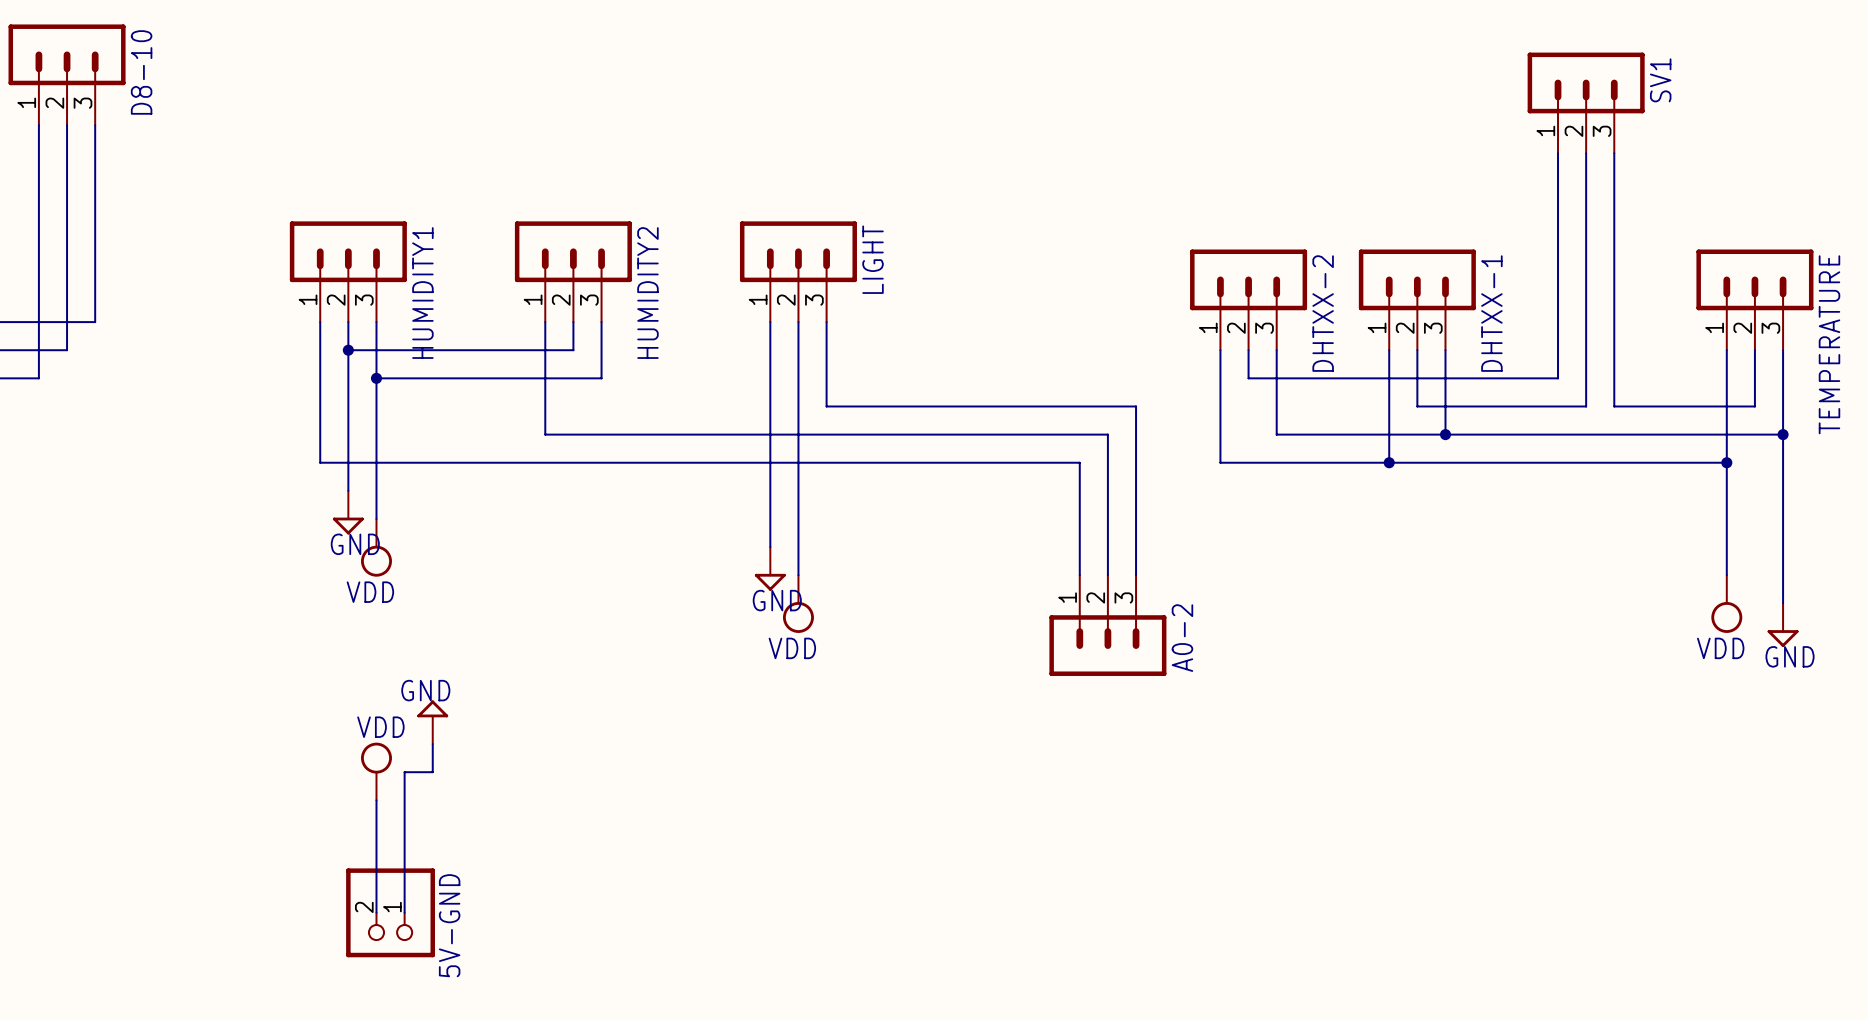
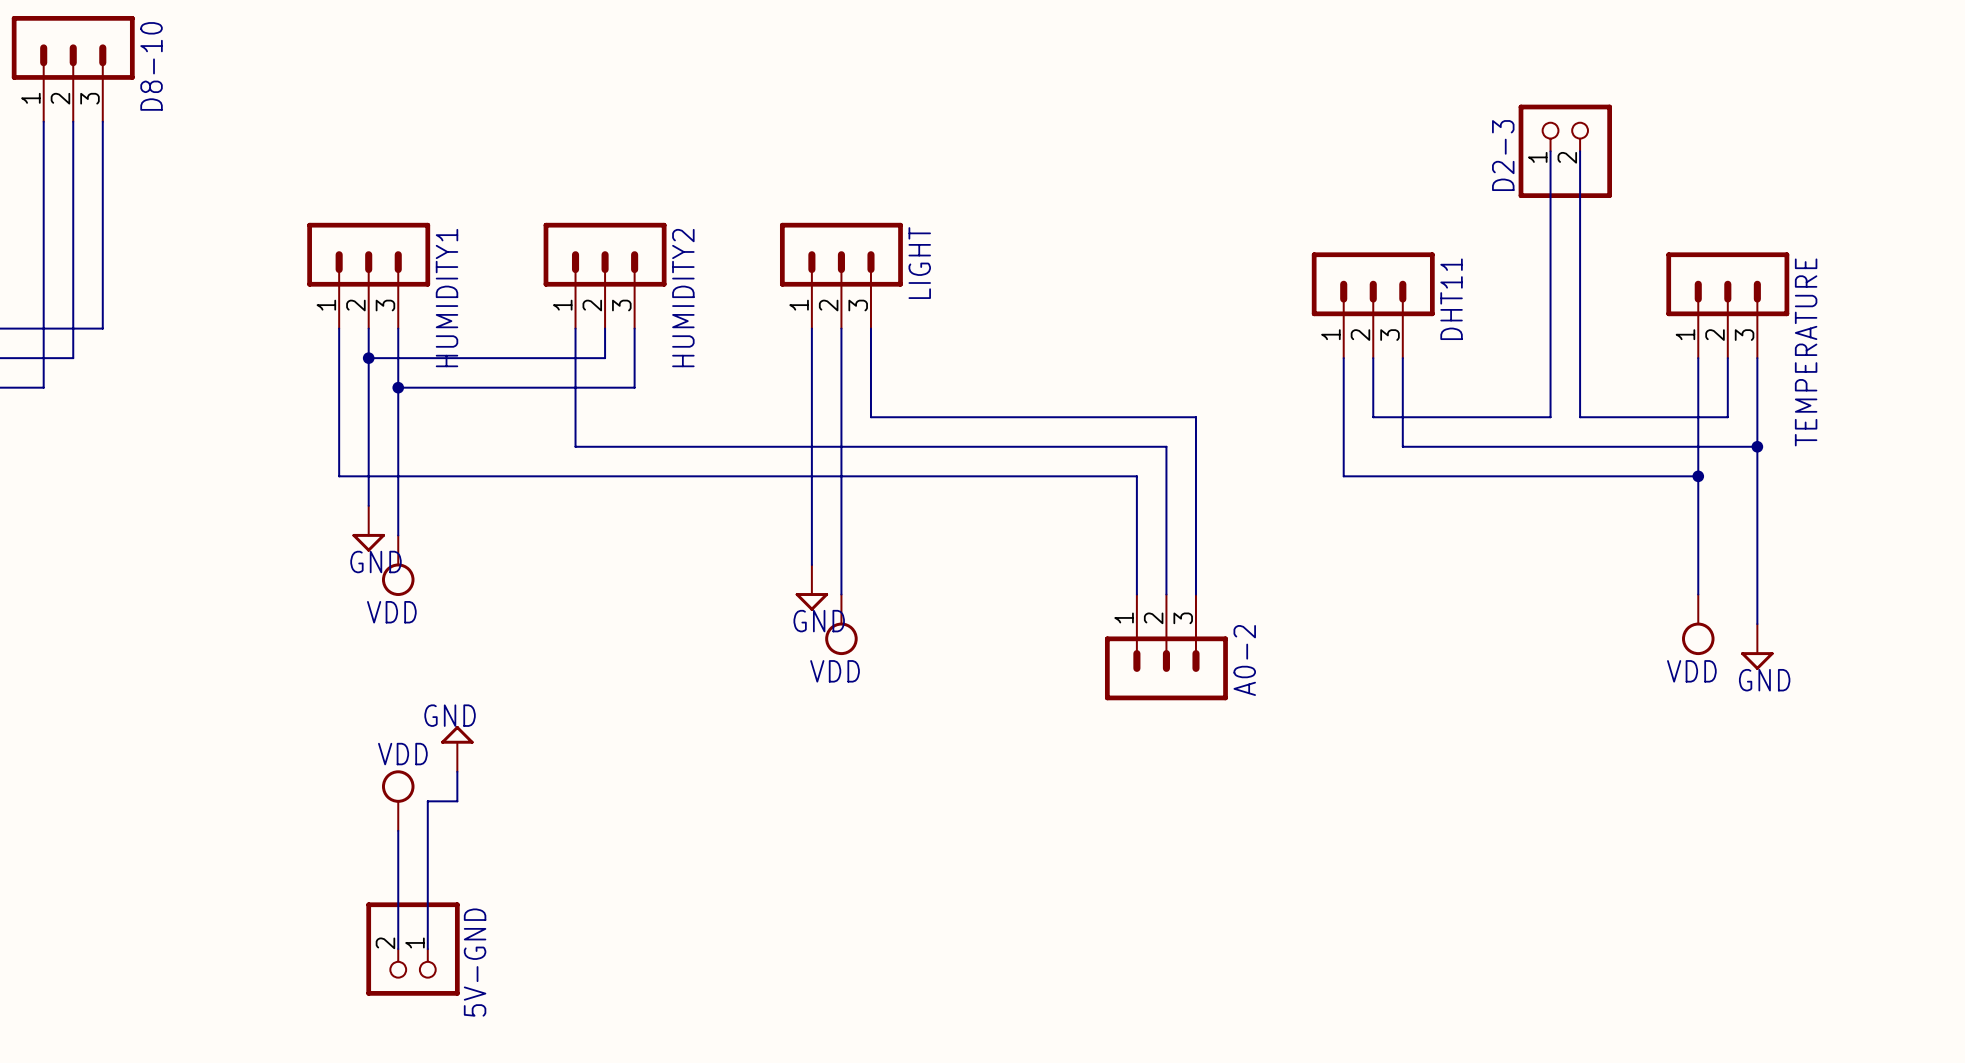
SV1: (1586, 102) -> none
D2-3: none -> (1565, 151)
wire: none -> (1580, 151) (1580, 417)
wire: (1558, 153) (1558, 378) (1248, 378) (1248, 350) -> none
wire: (1586, 153) (1586, 406) -> (1698, 594) (1698, 417) (1668, 417)
wire: (1614, 153) (1614, 350) -> none
DHTXX-2: (1248, 299) -> none
DHT11: none -> (1373, 305)
DHTXX-1: (1417, 299) -> none
TEMPERATURE position: (1754, 299) -> (1727, 305)
wire: (1220, 350) (1220, 462) (1276, 462) -> none
wire: (1389, 350) (1389, 462) -> none
wire: (1417, 350) (1417, 406) -> (1373, 358) (1373, 417) (1491, 417)
wire: (1445, 350) (1445, 434) -> (1402, 358) (1402, 446)
wire: (1726, 350) (1726, 575) -> none
wire: (1754, 350) (1754, 406) (1642, 406) -> (1727, 358) (1727, 417)
wire: (1783, 350) (1783, 603) -> (1757, 358) (1757, 624)
wire: (1473, 406) (1501, 406) -> (1550, 417) (1550, 151)
wire: (1276, 434) (1332, 434) -> (1343, 446) (1343, 476)
junction: (1445, 434) -> none
wire: (1670, 434) (1783, 434) -> none
junction: none -> (1757, 446)
junction: (1783, 434) -> none
junction: (1389, 462) -> none
wire: (1614, 462) (1726, 462) -> none
junction: none -> (1698, 476)
junction: (1726, 462) -> none
power symbol position: VDD (1726, 604) -> VDD (1698, 624)
power symbol position: GND (1783, 625) -> GND (1757, 646)

